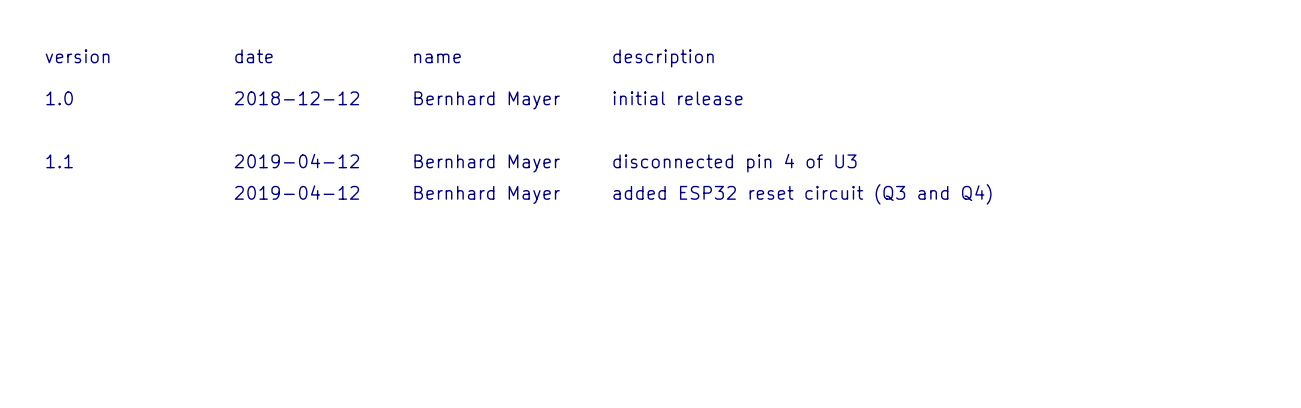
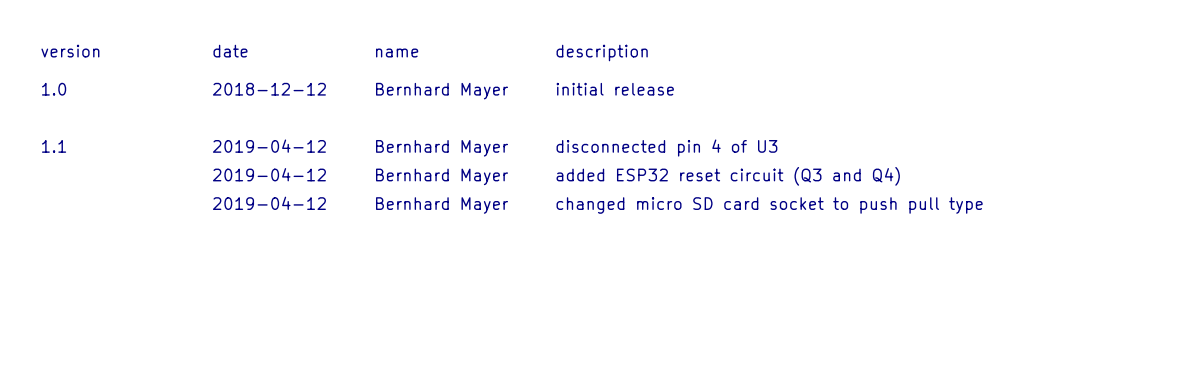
text: none -> 2019-04-12 (269, 203)
text: none -> Bernhard Mayer (442, 205)
text: none -> changed micro SD card socket to push pull type (769, 205)

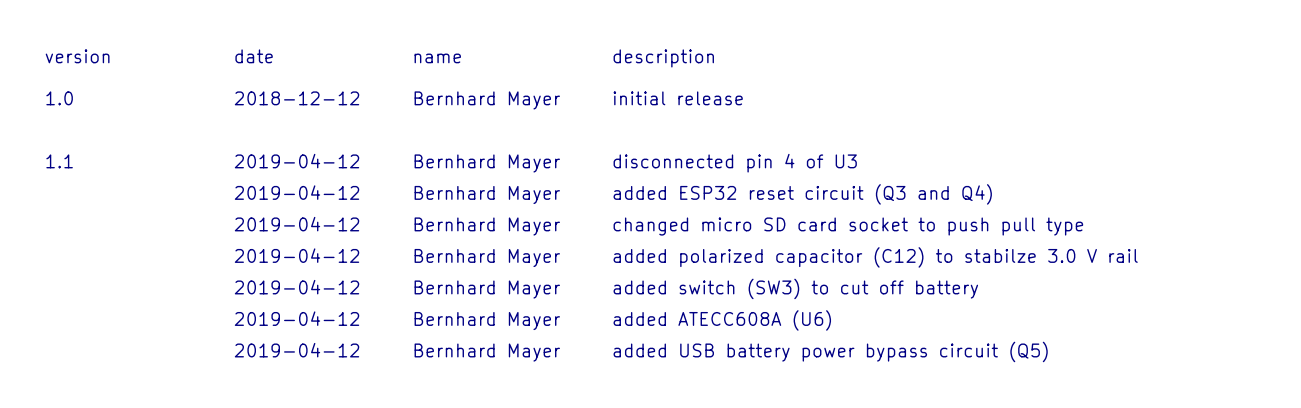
text: none -> 2019-04-12 (297, 255)
text: none -> added polarized capacitor (C12) to stabilze 3.0 V rail (875, 257)
text: none -> Bernhard Mayer (487, 258)
text: none -> 2019-04-12 (297, 287)
text: none -> Bernhard Mayer (487, 289)
text: none -> added switch (SW3) to cut off battery (795, 288)
text: none -> 2019-04-12 (297, 318)
text: none -> added ATECC608A (U6) (722, 320)
text: none -> Bernhard Mayer (487, 321)
text: none -> 2019-04-12 (297, 350)
text: none -> Bernhard Mayer (487, 352)
text: none -> added USB battery power bypass circuit (Q5) (830, 351)

